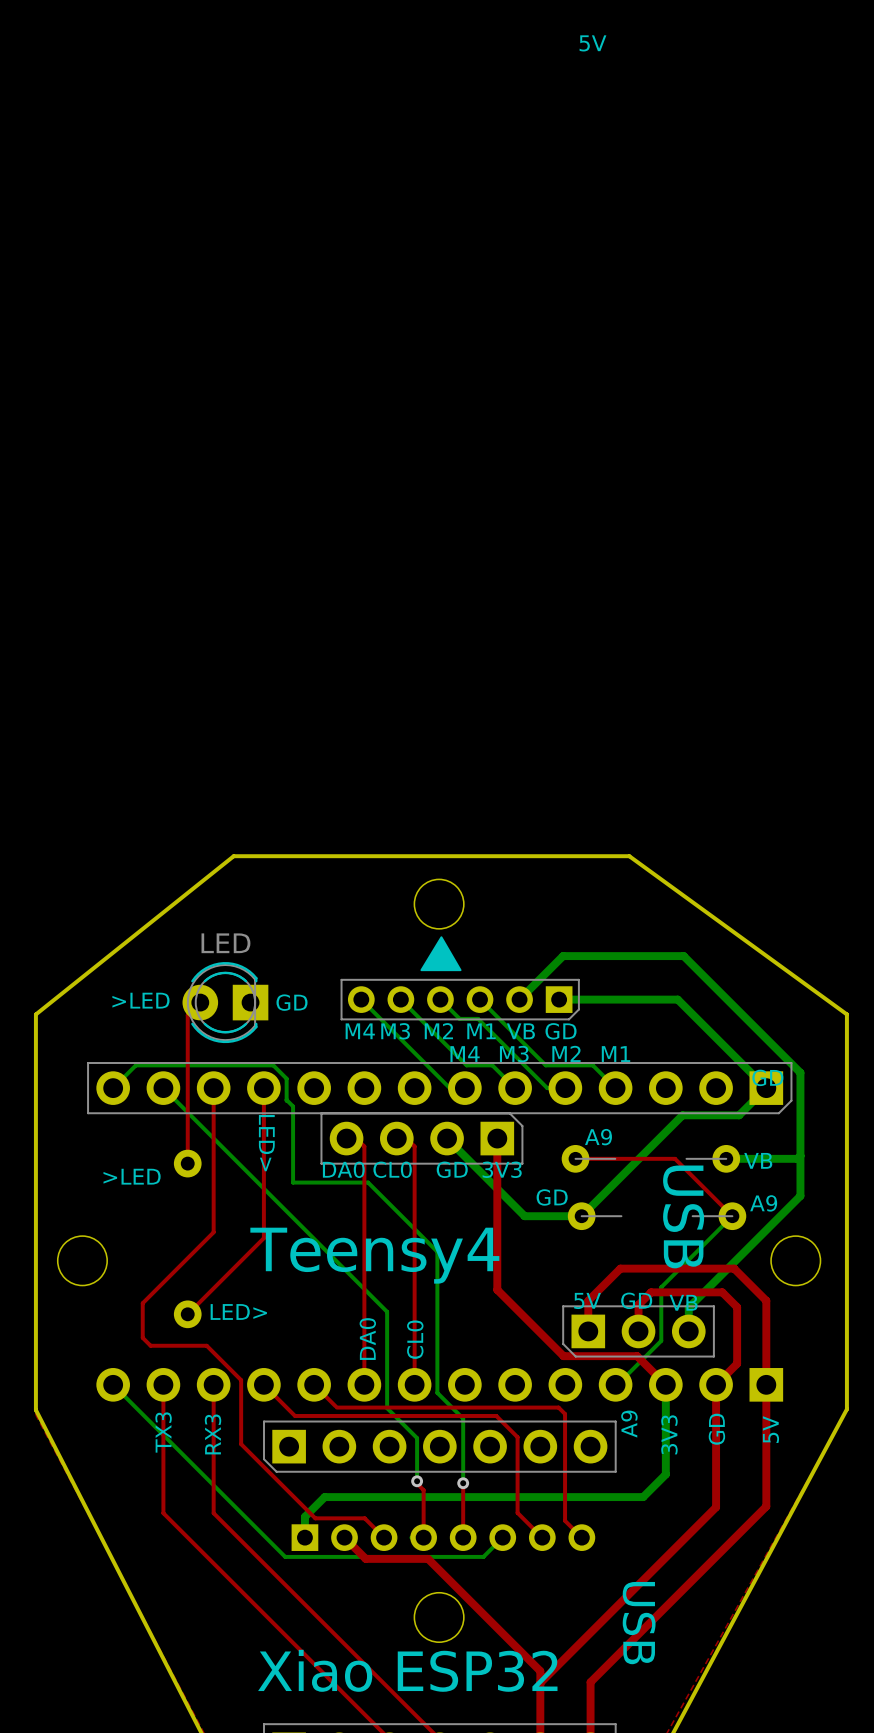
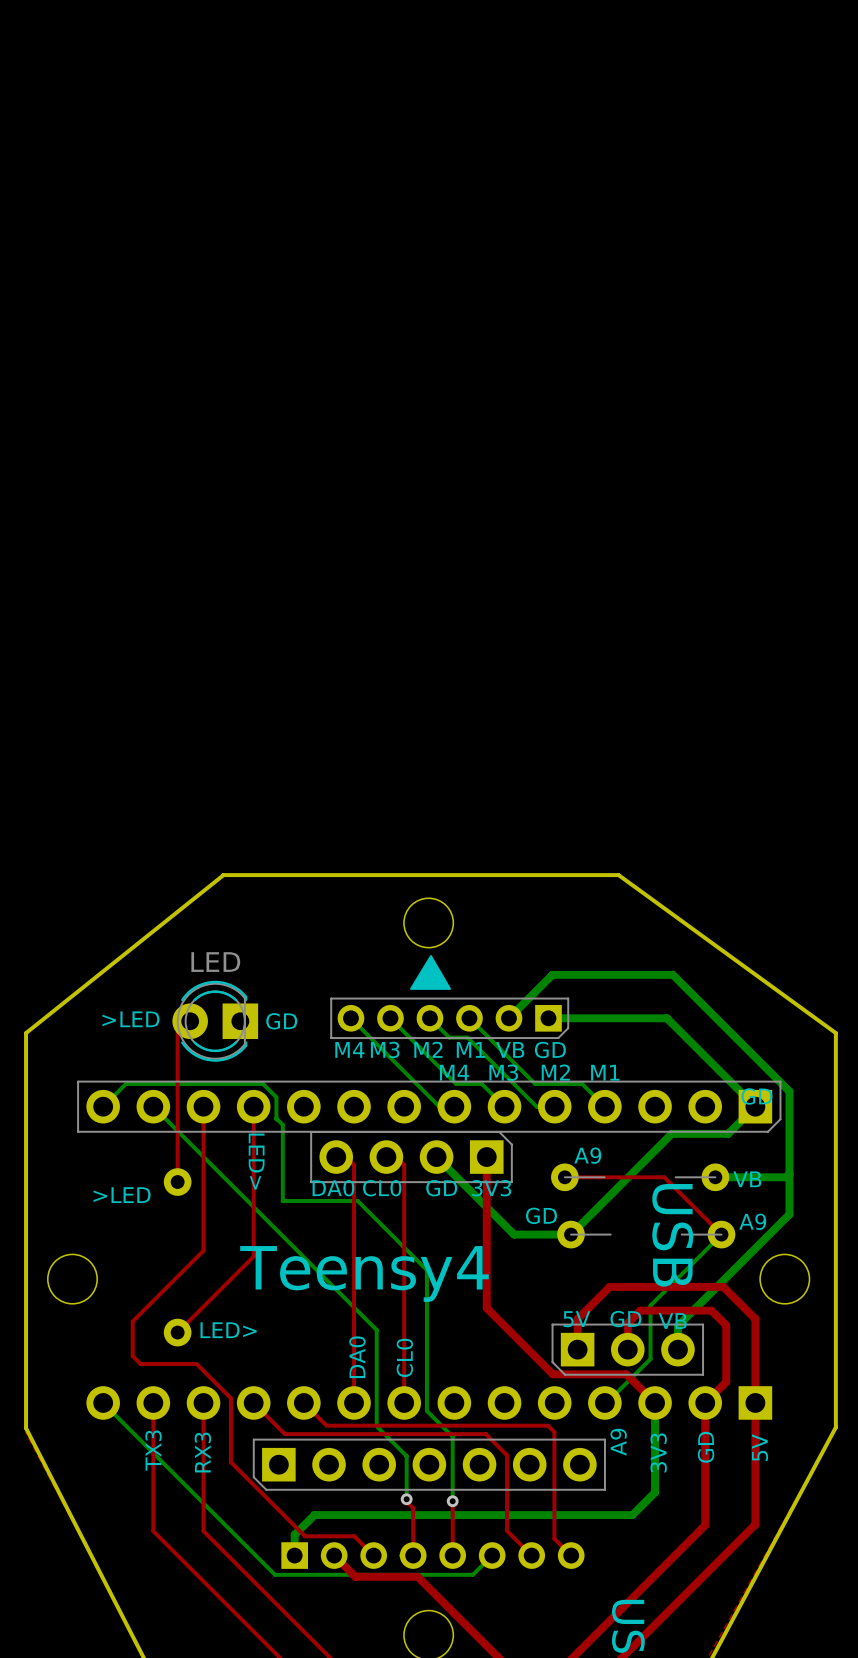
text: 5V (592, 43) -> none

